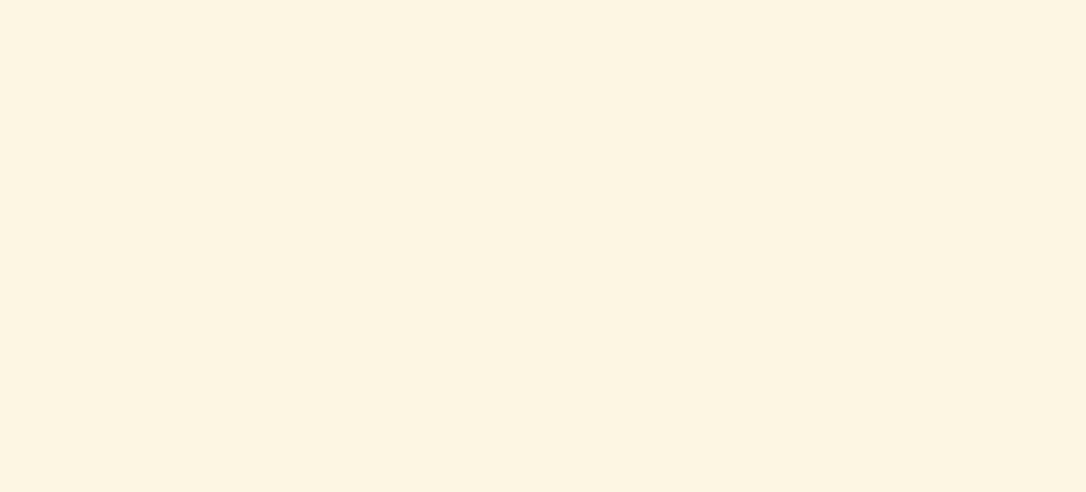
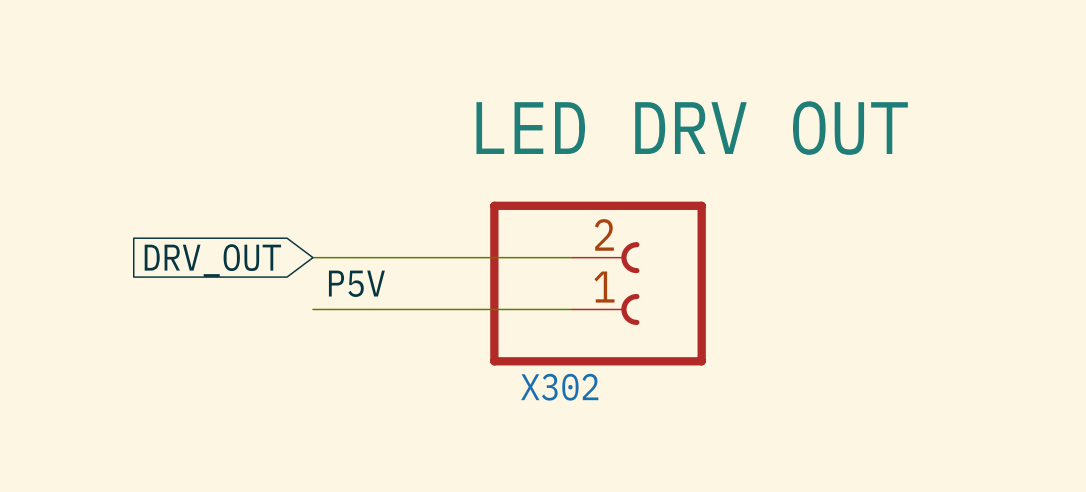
wire: none -> (312, 257) (572, 257)
global label: none -> DRV_OUT (212, 260)
label: none -> P5V (356, 283)
X302: none -> (598, 283)
wire: none -> (312, 309) (572, 309)

